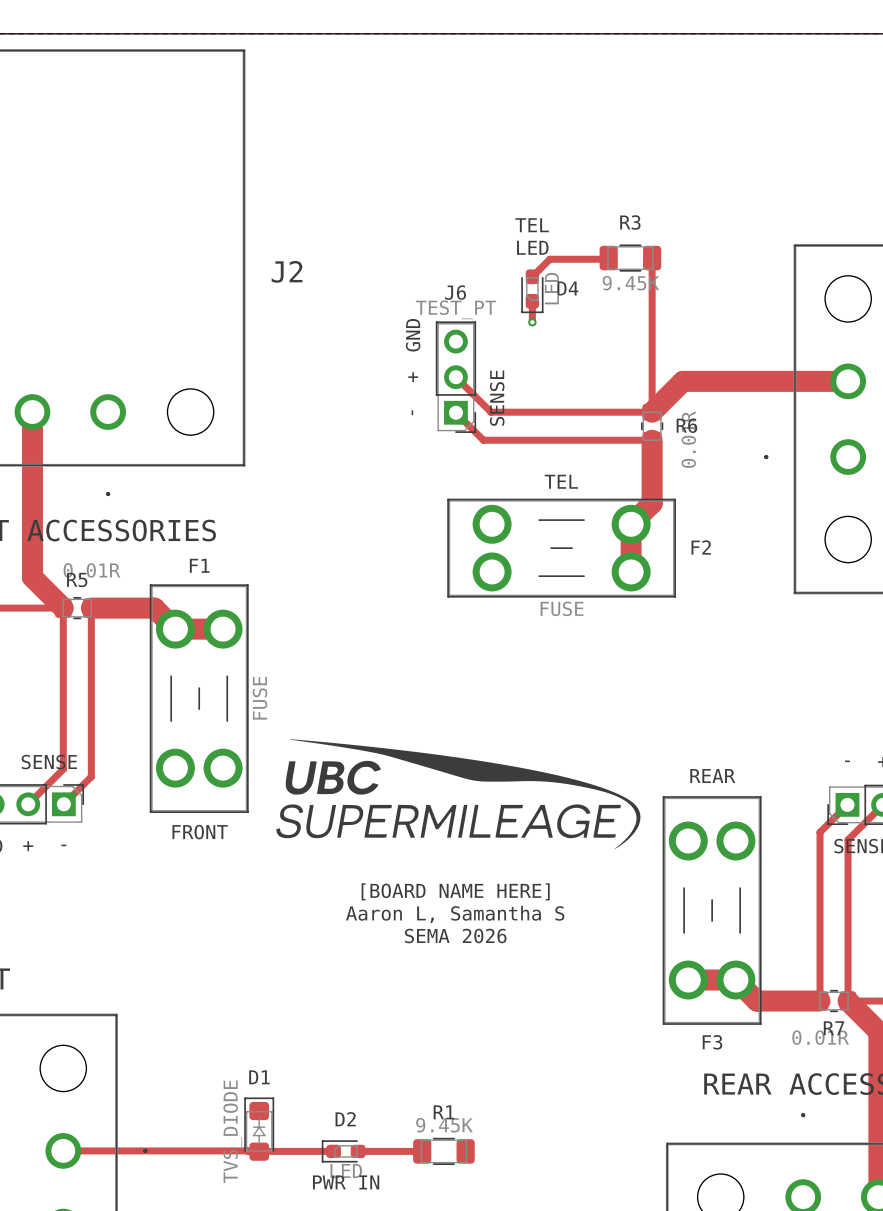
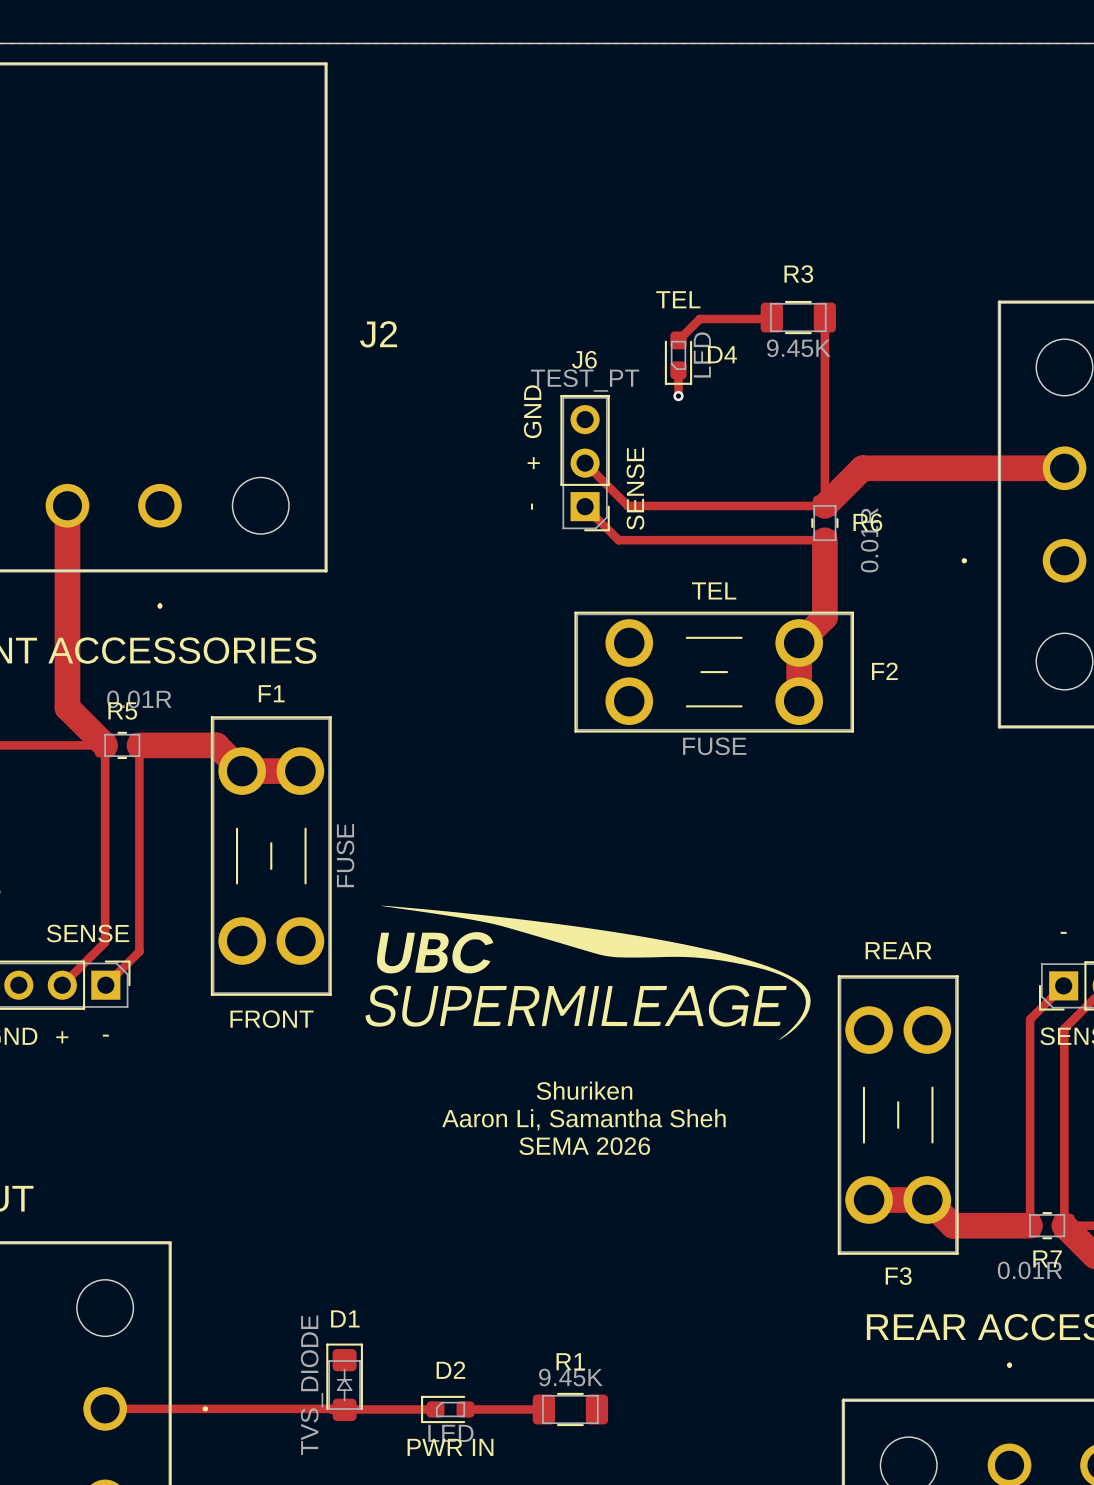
text: TEL (532, 225) -> none
text: LED (532, 247) -> TEL (678, 299)
text: [BOARD NAME HERE] (455, 891) -> Shuriken (584, 1090)
text: Aaron L, Samantha S (455, 914) -> Aaron Li, Samantha Sheh (583, 1119)

